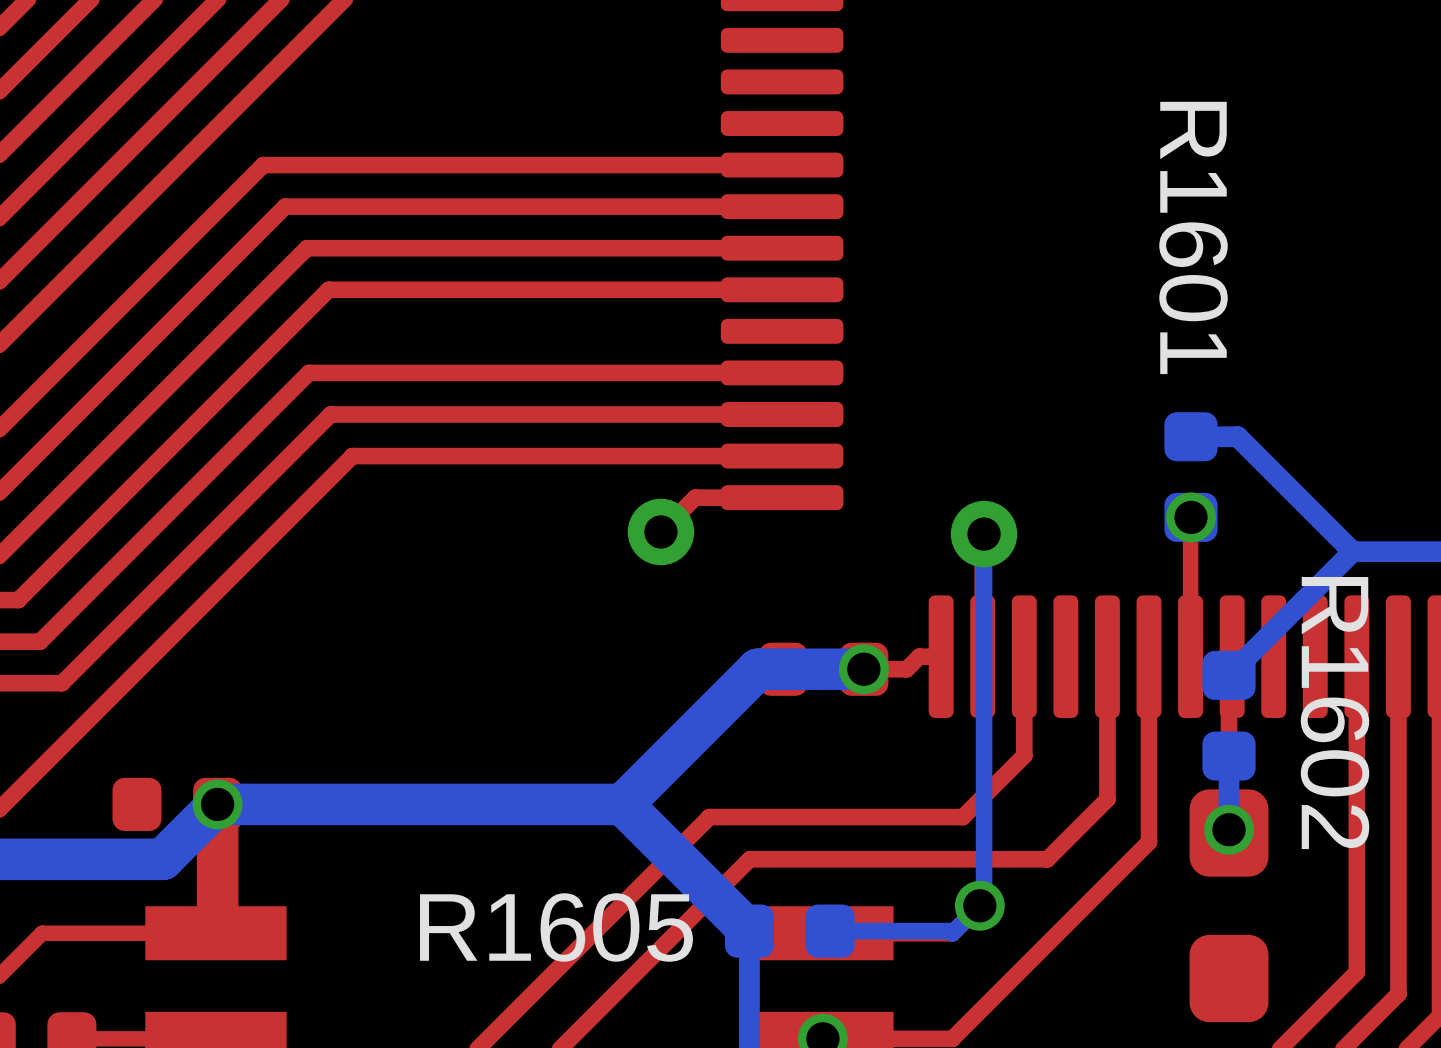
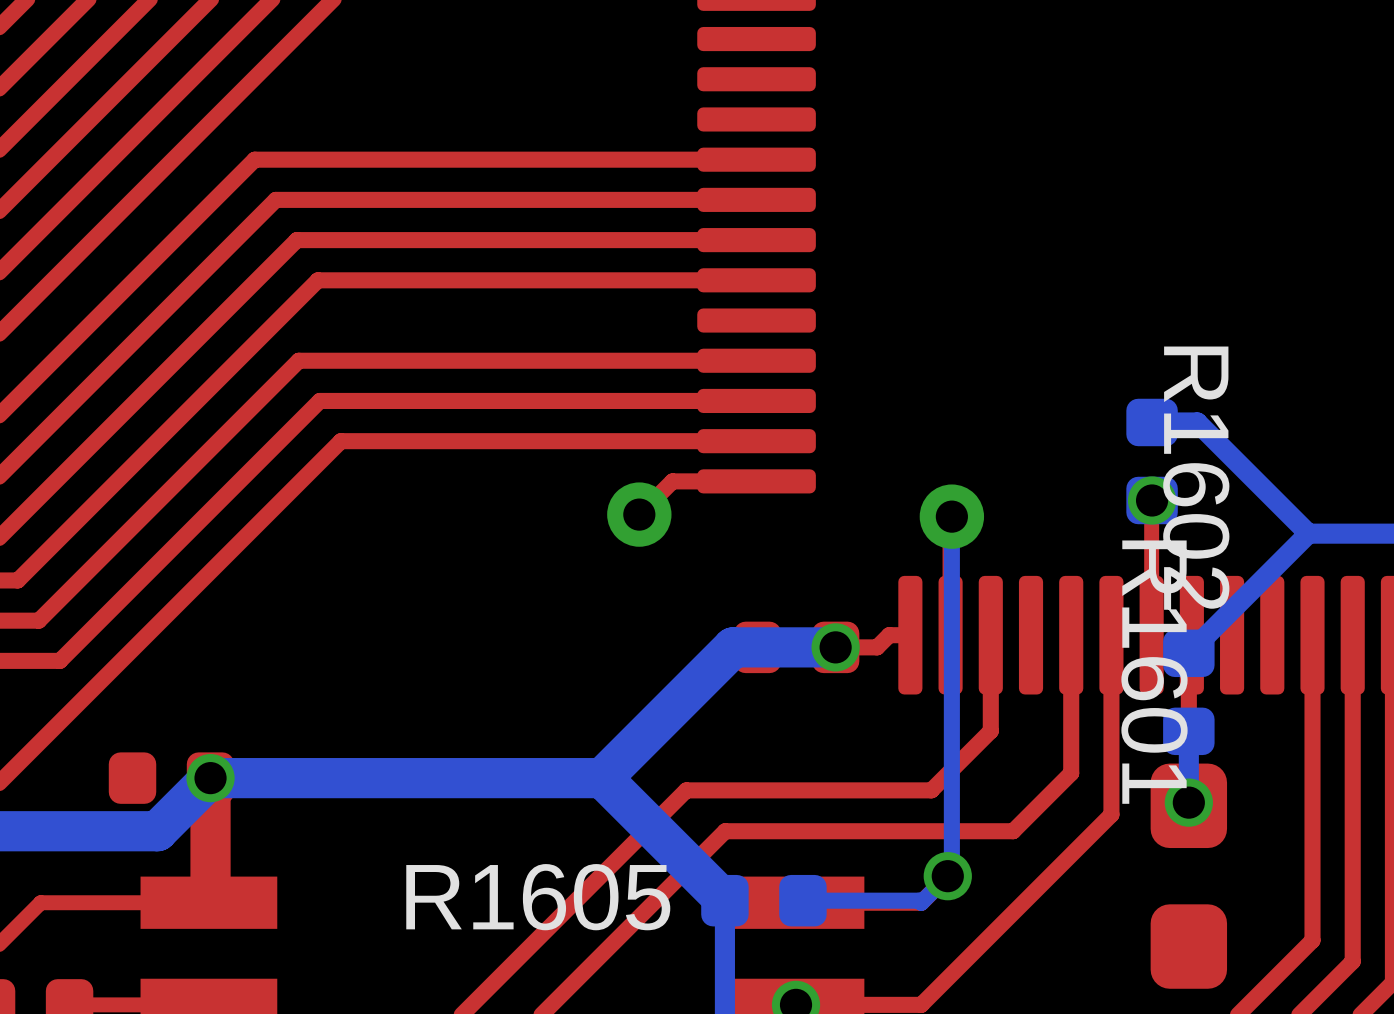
R1601 name position: R1601 (1193, 237) -> R1601 (1154, 672)
R1602 name position: R1602 (1335, 713) -> R1602 (1196, 478)

